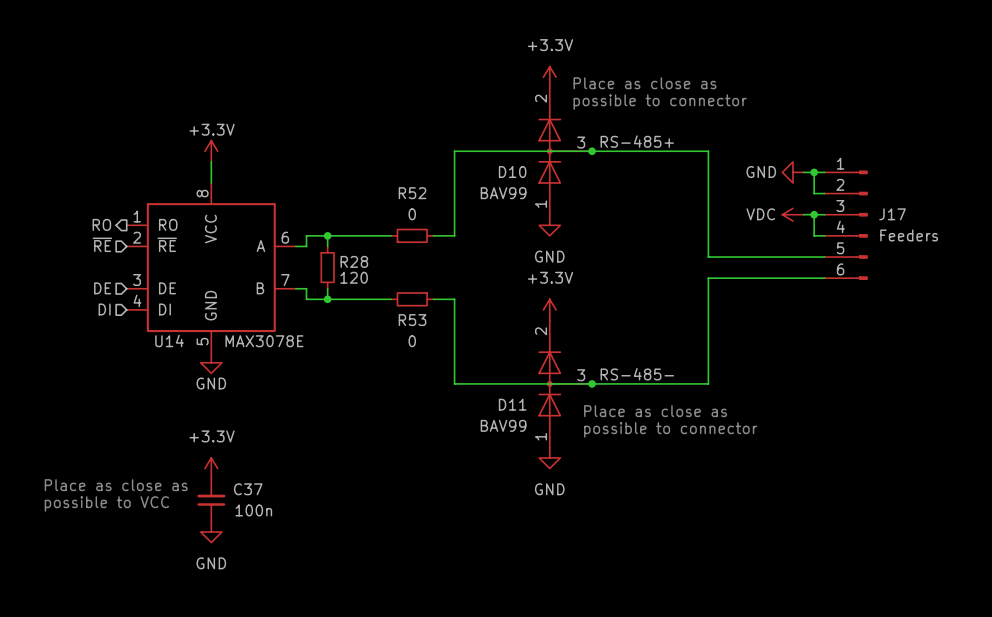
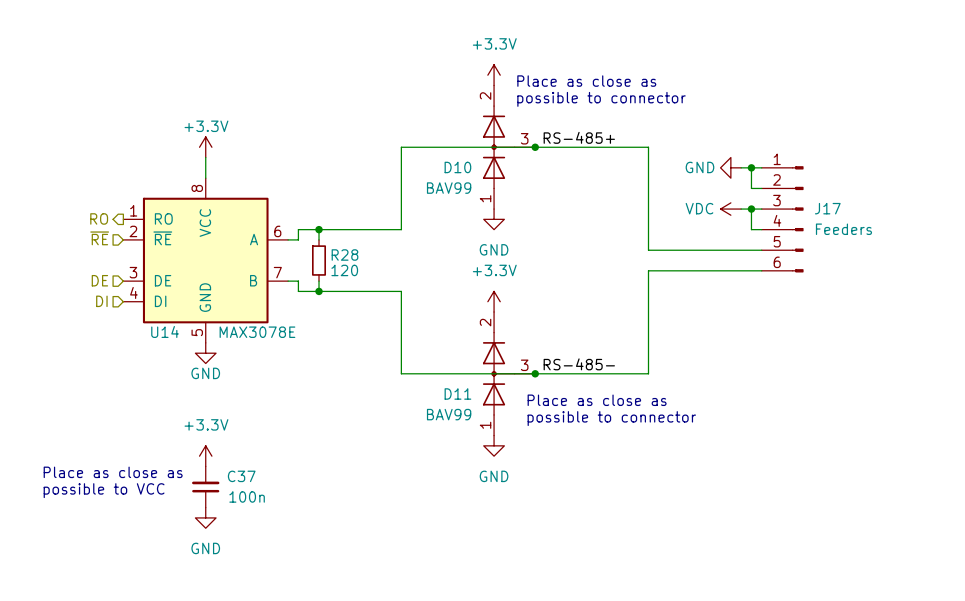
power symbol position: +3.3V (549, 77) -> +3.3V (494, 75)
text position: Place as close as (645, 83) -> Place as close as (586, 81)
text position: possible to connector (660, 102) -> possible to connector (601, 99)
label position: RS-485+ (637, 141) -> RS-485+ (579, 137)
wire: (454, 151) (454, 235) (433, 235) -> (442, 147) (401, 147) (401, 229) (380, 229)
D10 position: (565, 151) -> (509, 147)
junction position: (592, 151) -> (535, 147)
wire: (666, 151) (708, 151) (708, 257) -> (648, 147) (648, 250) (689, 250)
junction: none -> (751, 167)
power symbol position: GND (793, 172) -> GND (730, 167)
wire: (814, 172) (814, 193) (824, 193) -> (751, 167) (751, 188) (761, 188)
junction: (814, 172) -> none
junction: none -> (751, 209)
power symbol position: VDC (793, 214) -> VDC (730, 209)
wire: (814, 214) (814, 235) (824, 235) -> (751, 209) (751, 229) (761, 229)
junction: (814, 214) -> none
power symbol position: GND (549, 225) -> GND (494, 219)
J17 position: (846, 225) -> (782, 219)
R52: 0 (412, 235) -> none
wire: (708, 278) (708, 383) (666, 383) -> (689, 270) (648, 270) (648, 373)
R53: 0 (412, 299) -> none
wire: (433, 299) (454, 299) (454, 383) -> (380, 291) (401, 291) (401, 373) (442, 373)
power symbol position: +3.3V (549, 309) -> +3.3V (494, 301)
label position: RS-485- (637, 374) -> RS-485- (579, 364)
D11 position: (565, 383) -> (509, 373)
junction position: (592, 383) -> (535, 373)
text position: Place as close as (655, 411) -> Place as close as (597, 400)
text position: possible to connector (670, 429) -> possible to connector (611, 418)
power symbol position: GND (549, 457) -> GND (494, 445)

